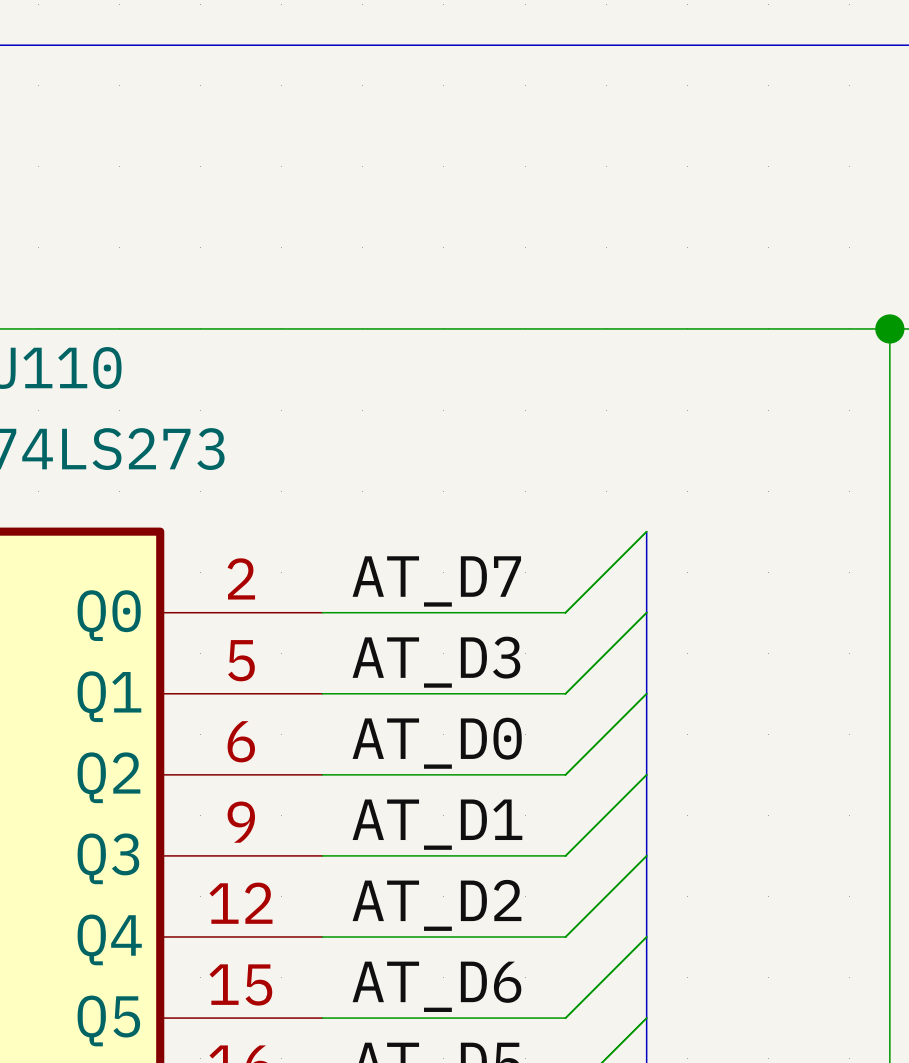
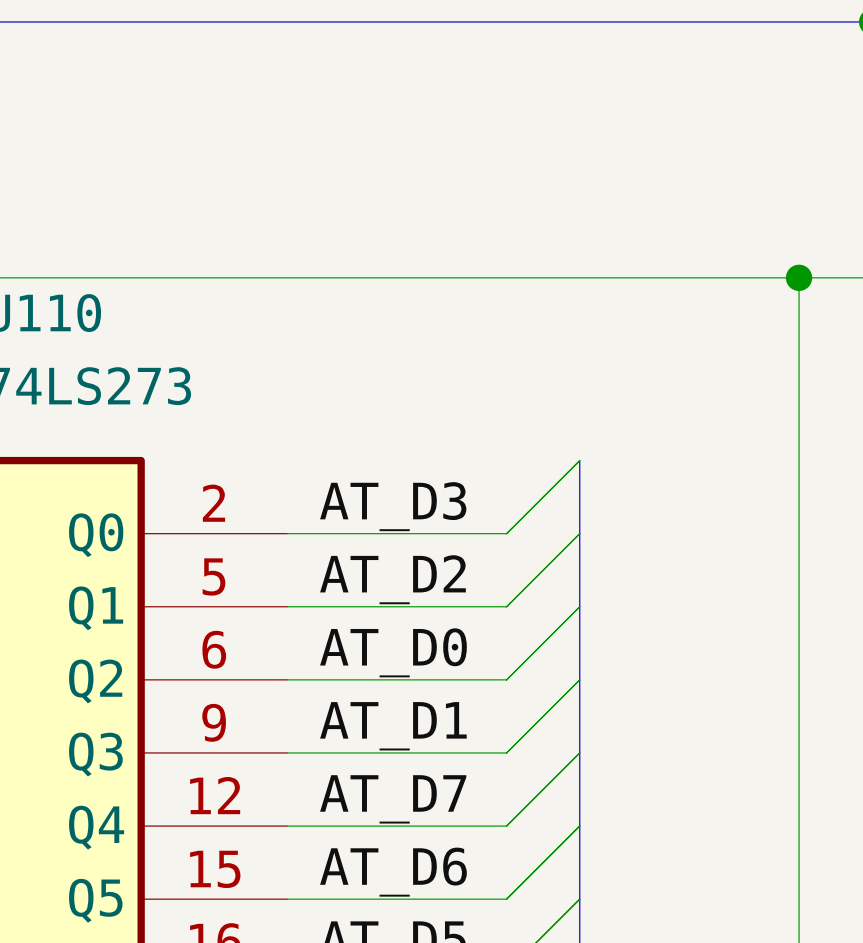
label: AT_D7 (436, 581) -> AT_D3 (393, 506)
label: AT_D3 (436, 662) -> AT_D2 (392, 579)
label: AT_D2 (437, 905) -> AT_D7 (393, 799)

